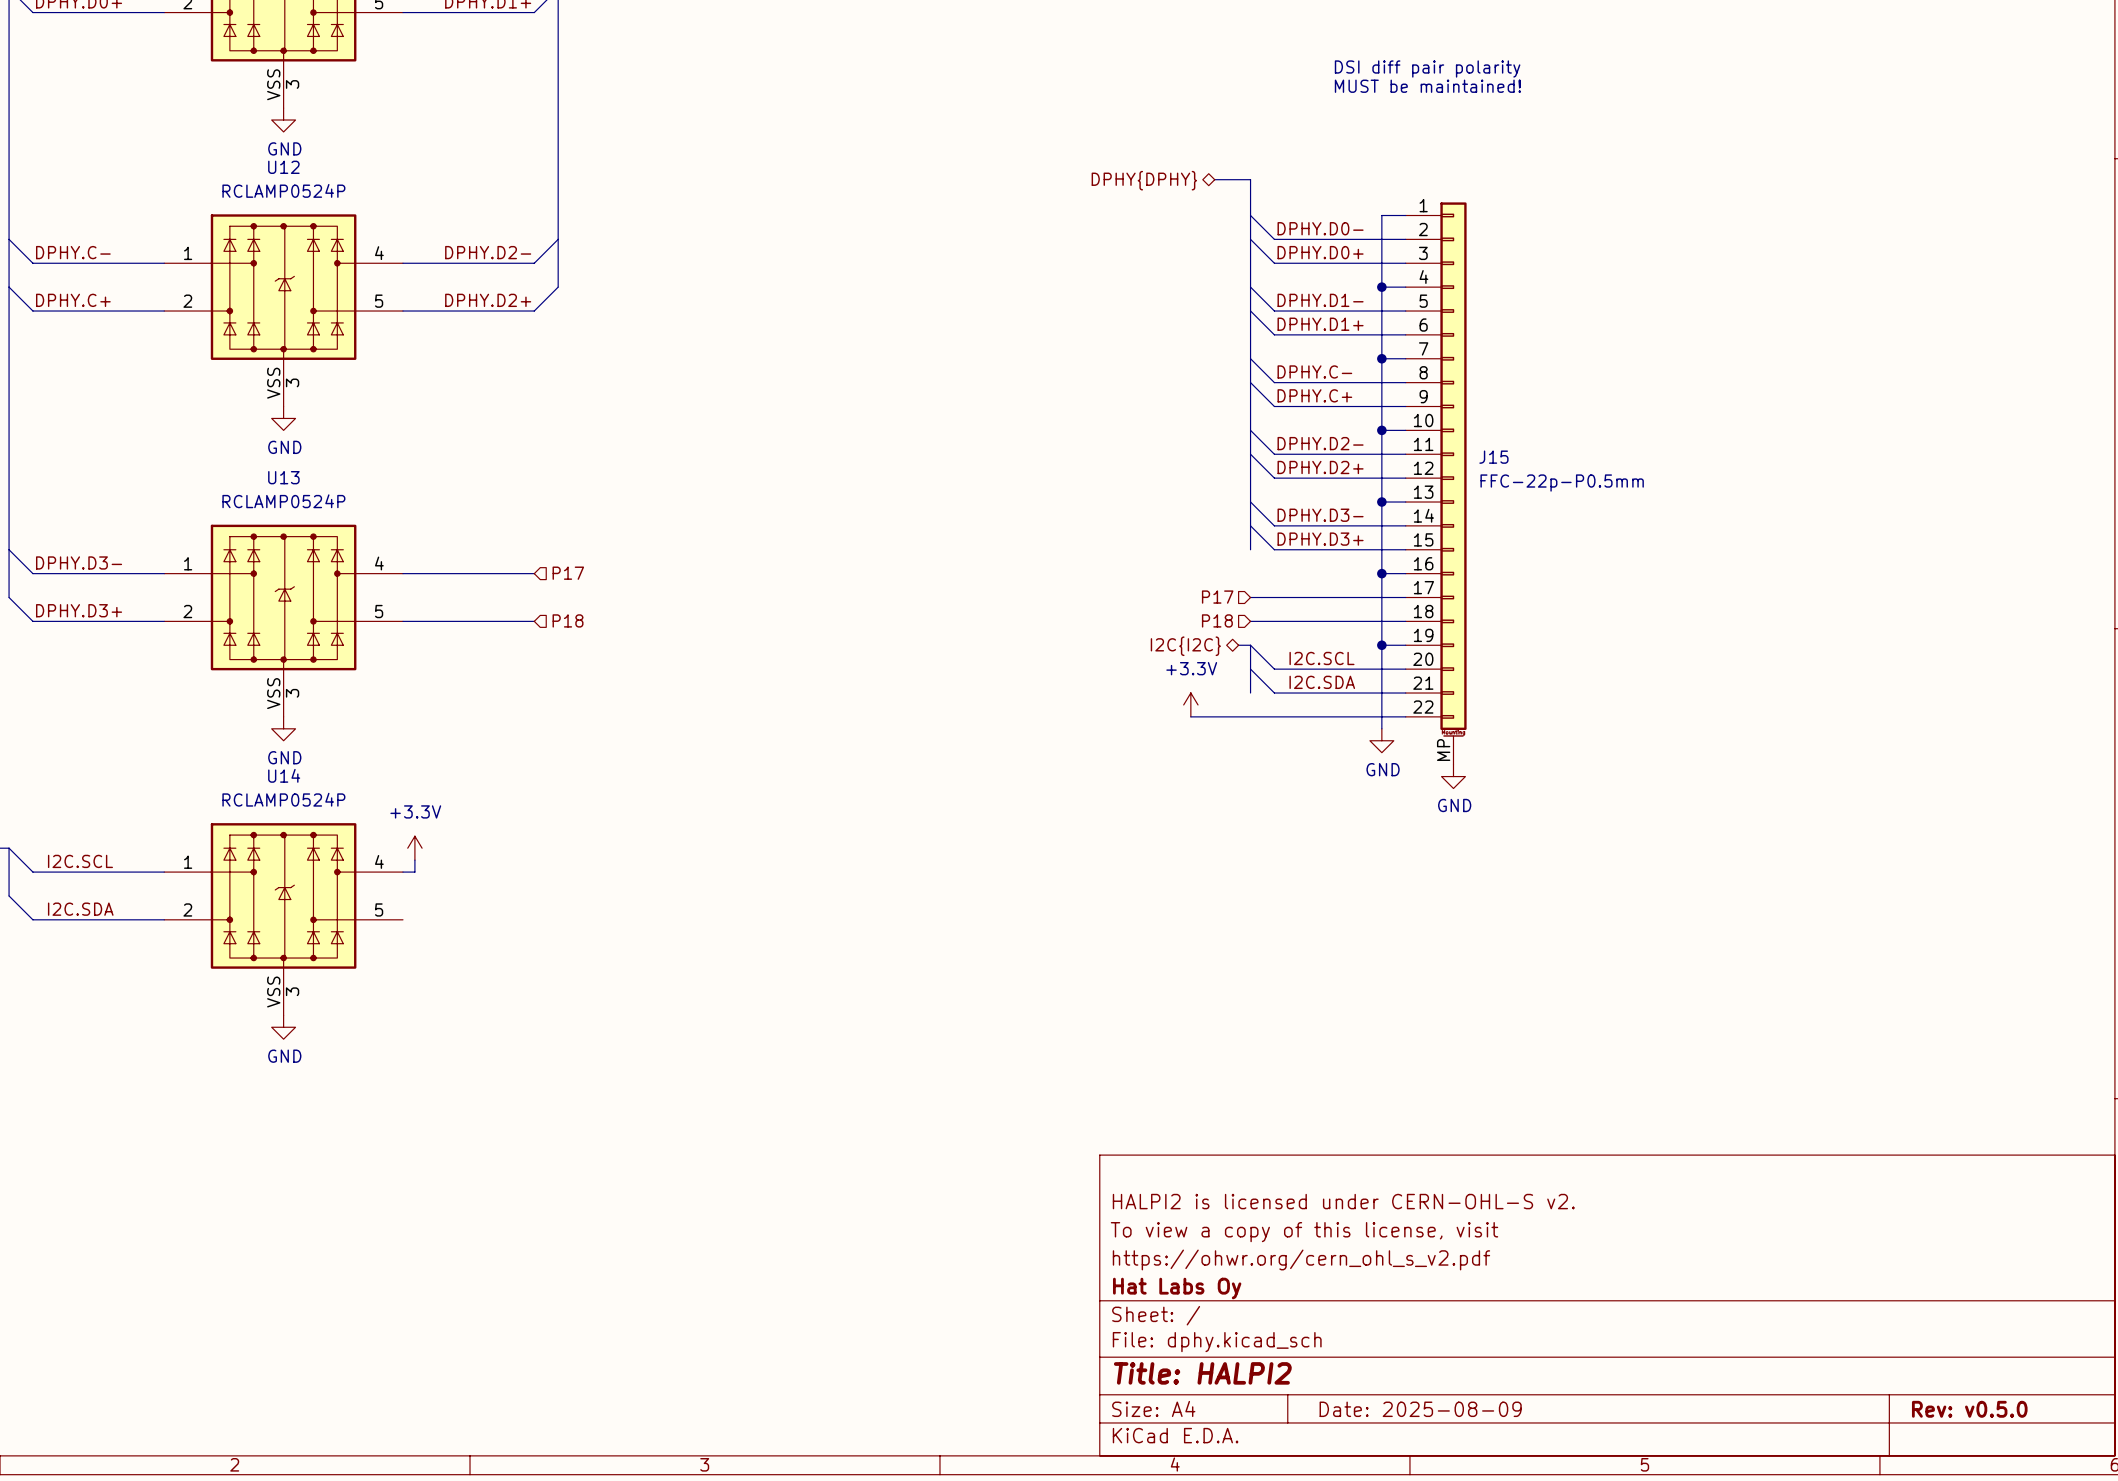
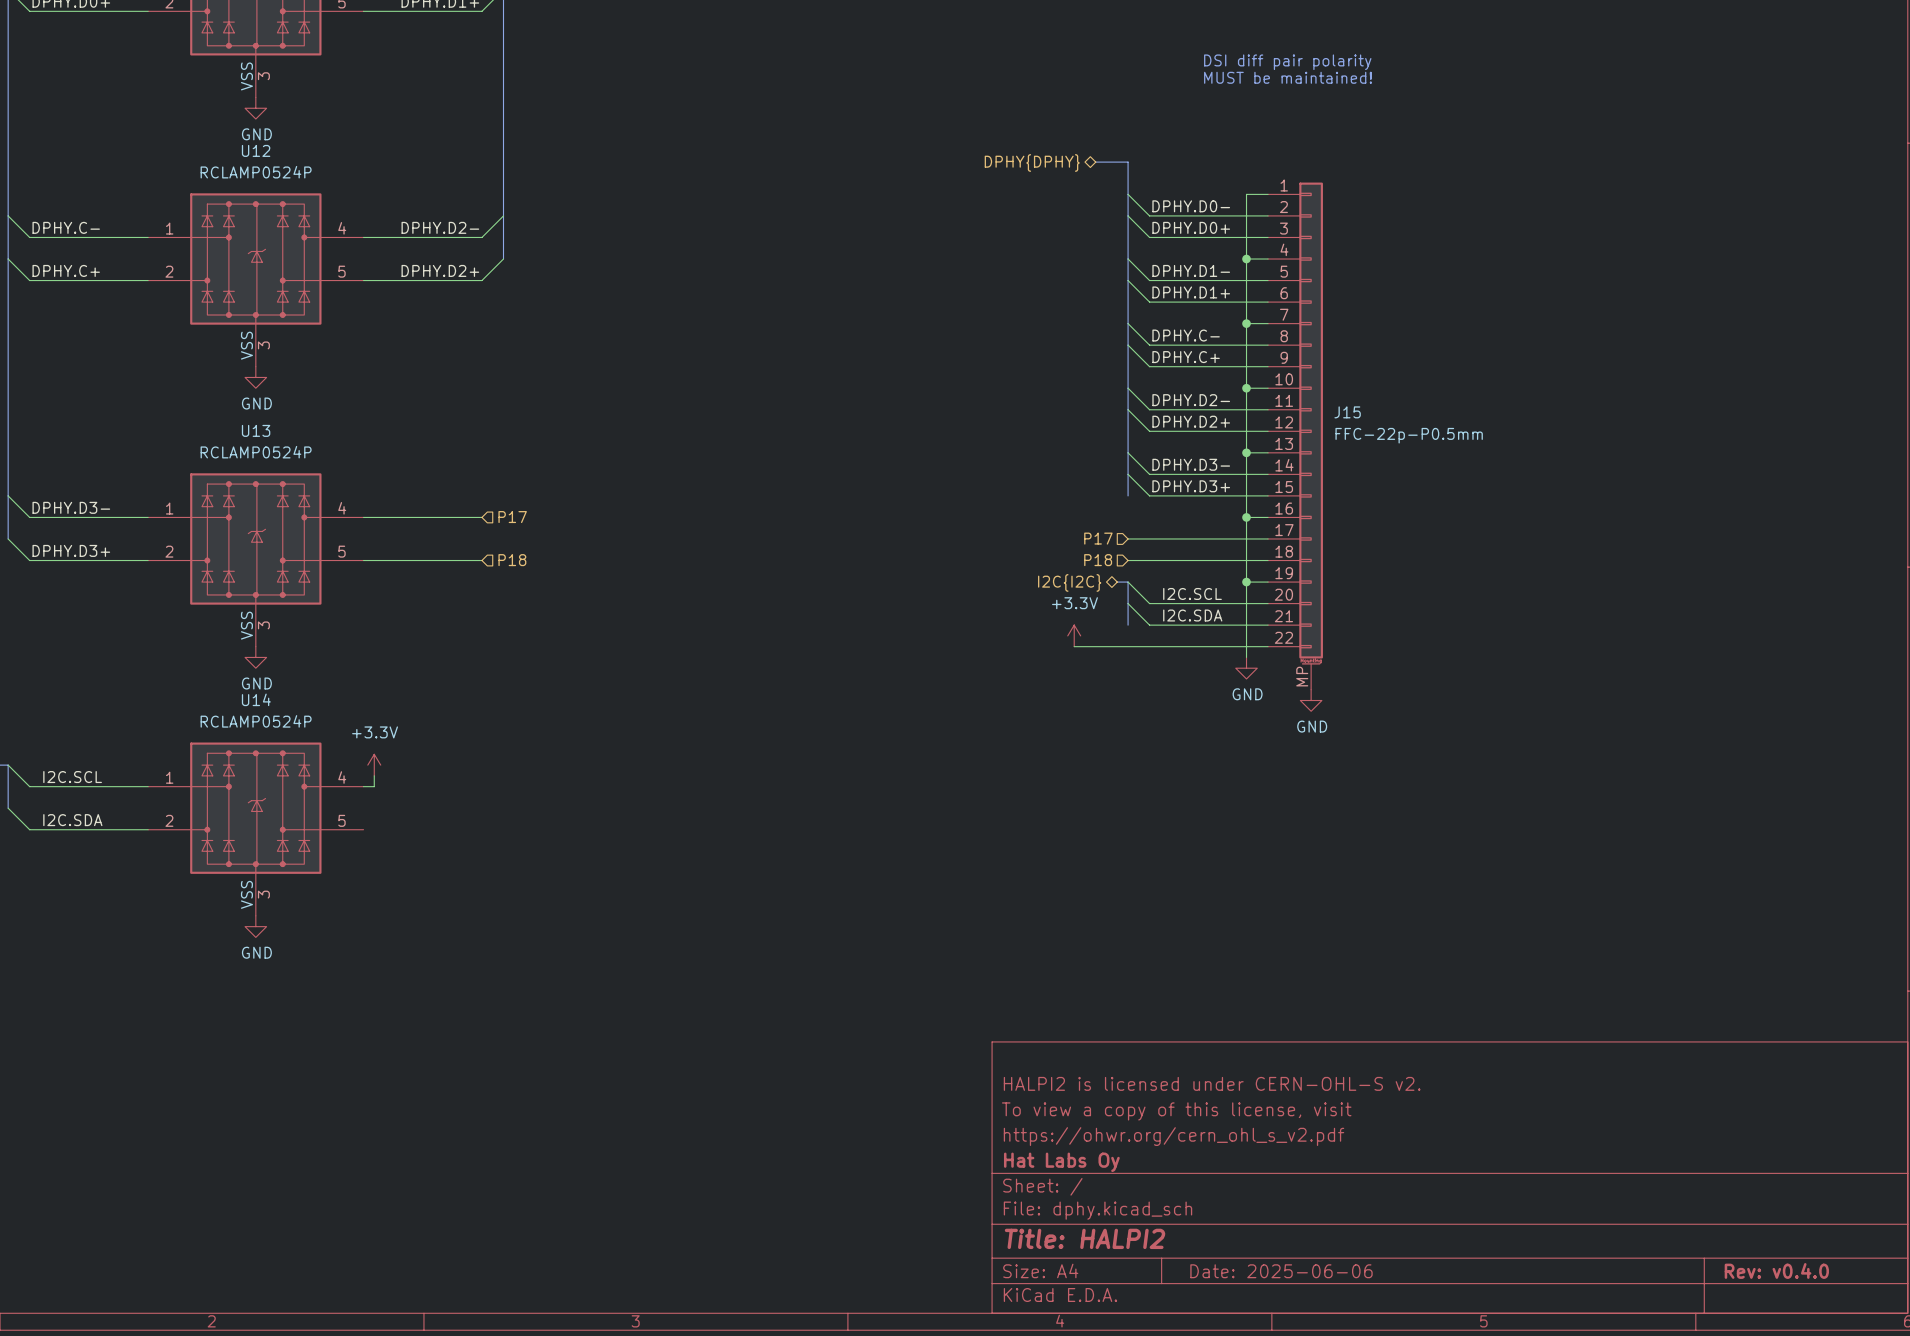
title block: Date: 2025-08-09 (1420, 1409) -> Date: 2025-06-06 (1281, 1271)
title block: Rev: v0.5.0 (1969, 1409) -> Rev: v0.4.0 (1776, 1270)

